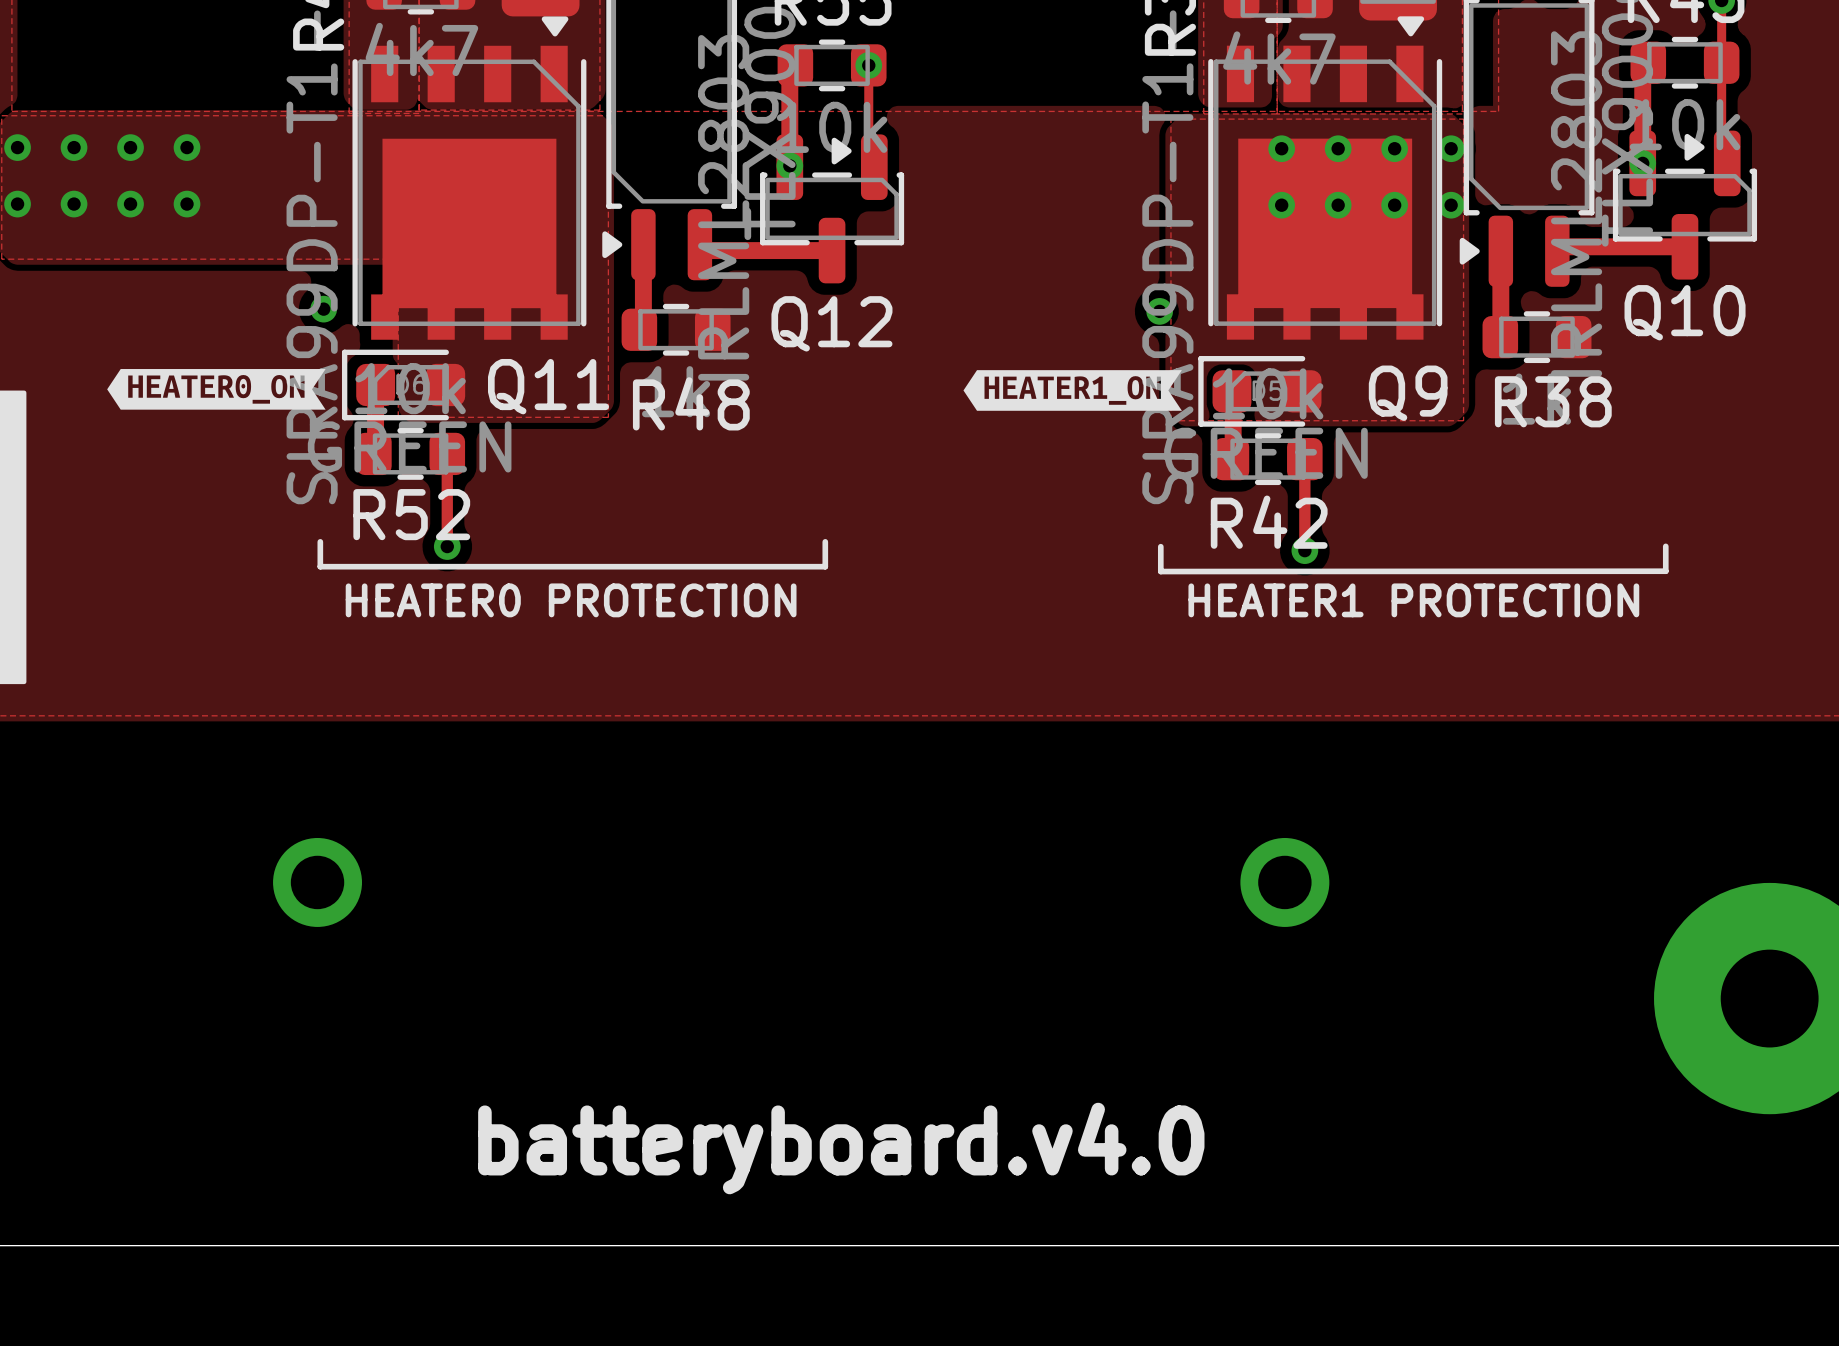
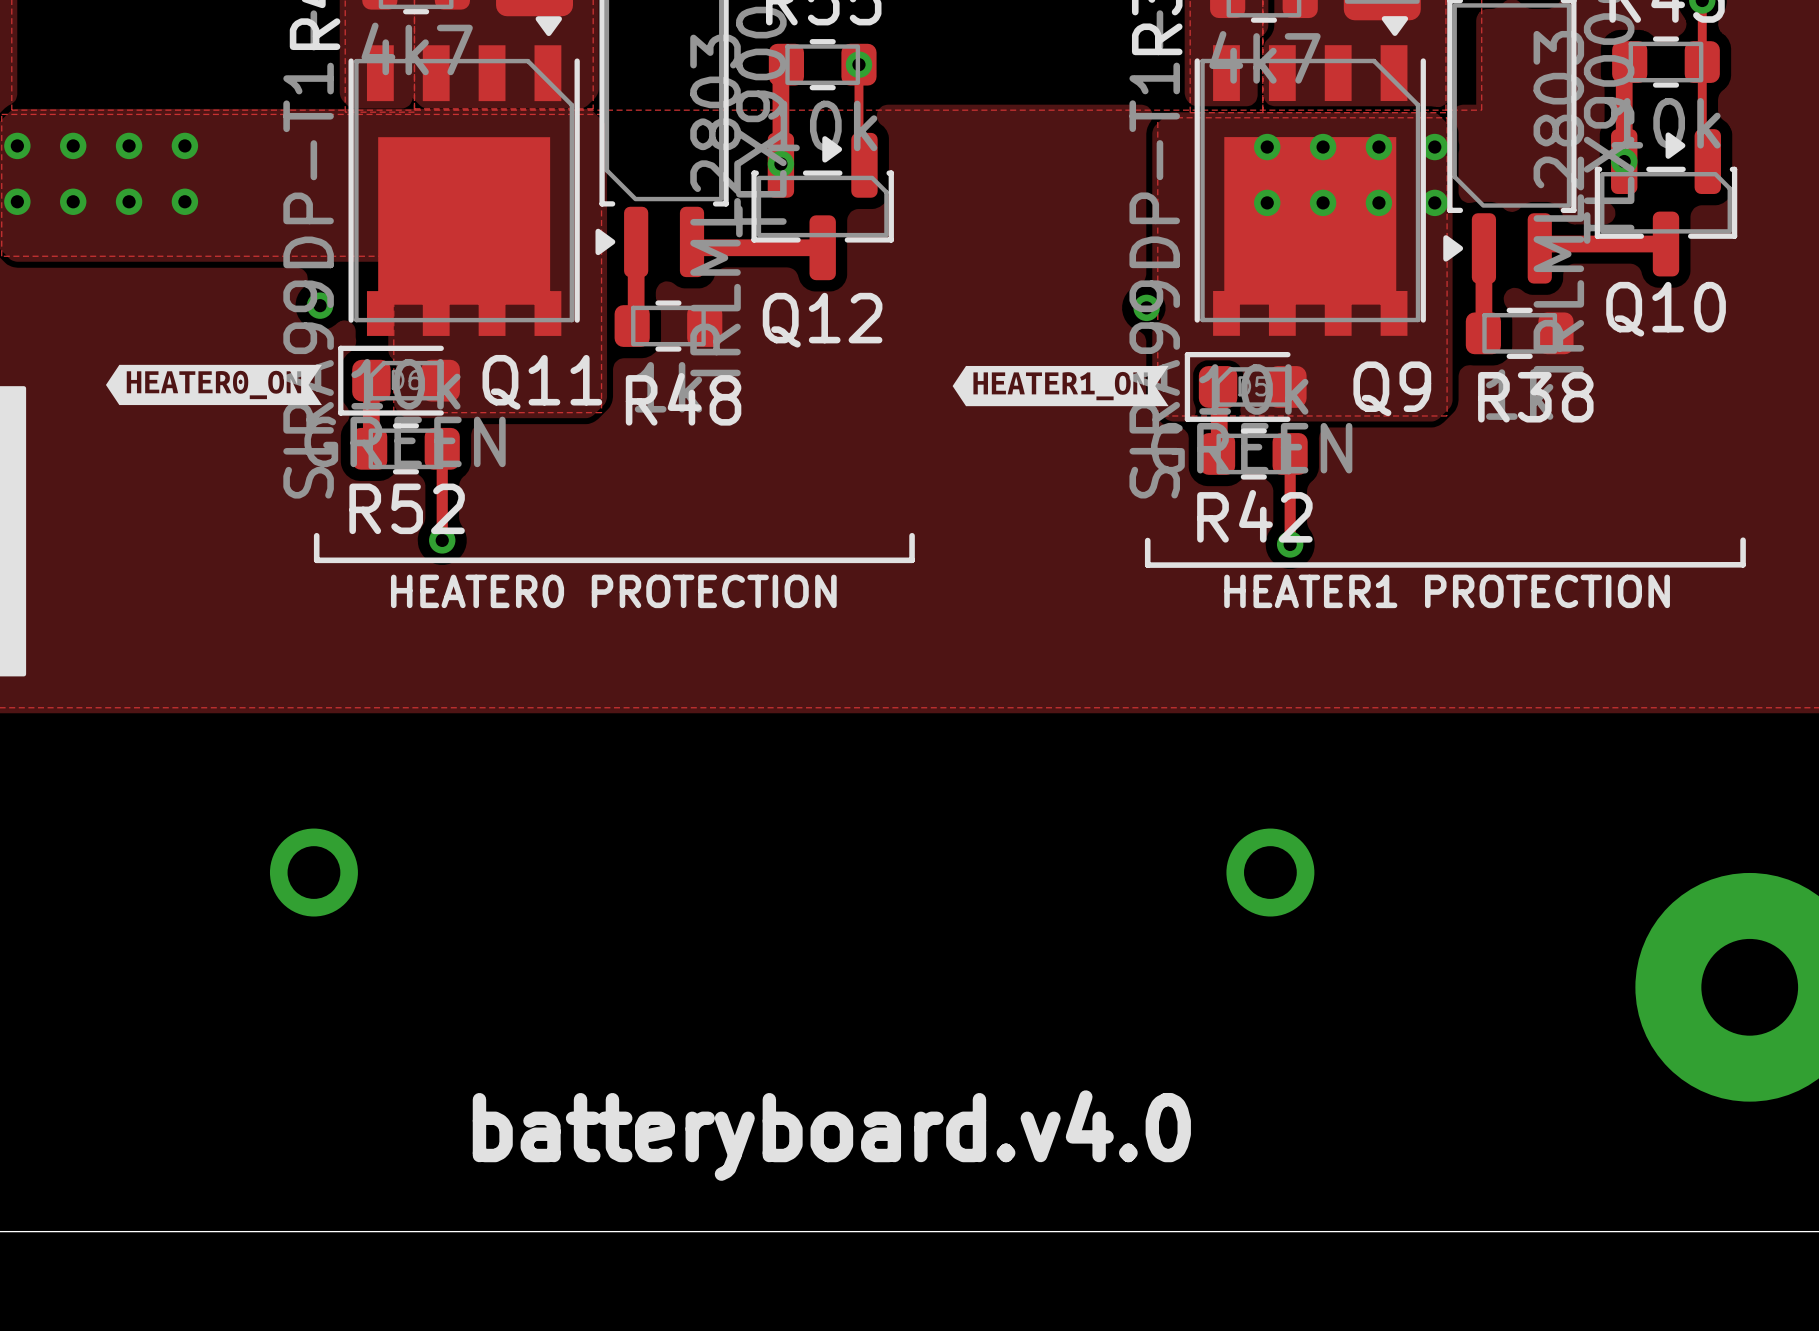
line: (825, 541) (825, 566) -> (912, 535) (912, 560) (815, 560)
line: (1665, 546) (1665, 571) (1160, 571) -> (1743, 540) (1743, 564) (1147, 565)
text position: HEATER0 PROTECTION (571, 600) -> HEATER0 PROTECTION (613, 591)
text position: HEATER1 PROTECTION (1413, 600) -> HEATER1 PROTECTION (1447, 591)

